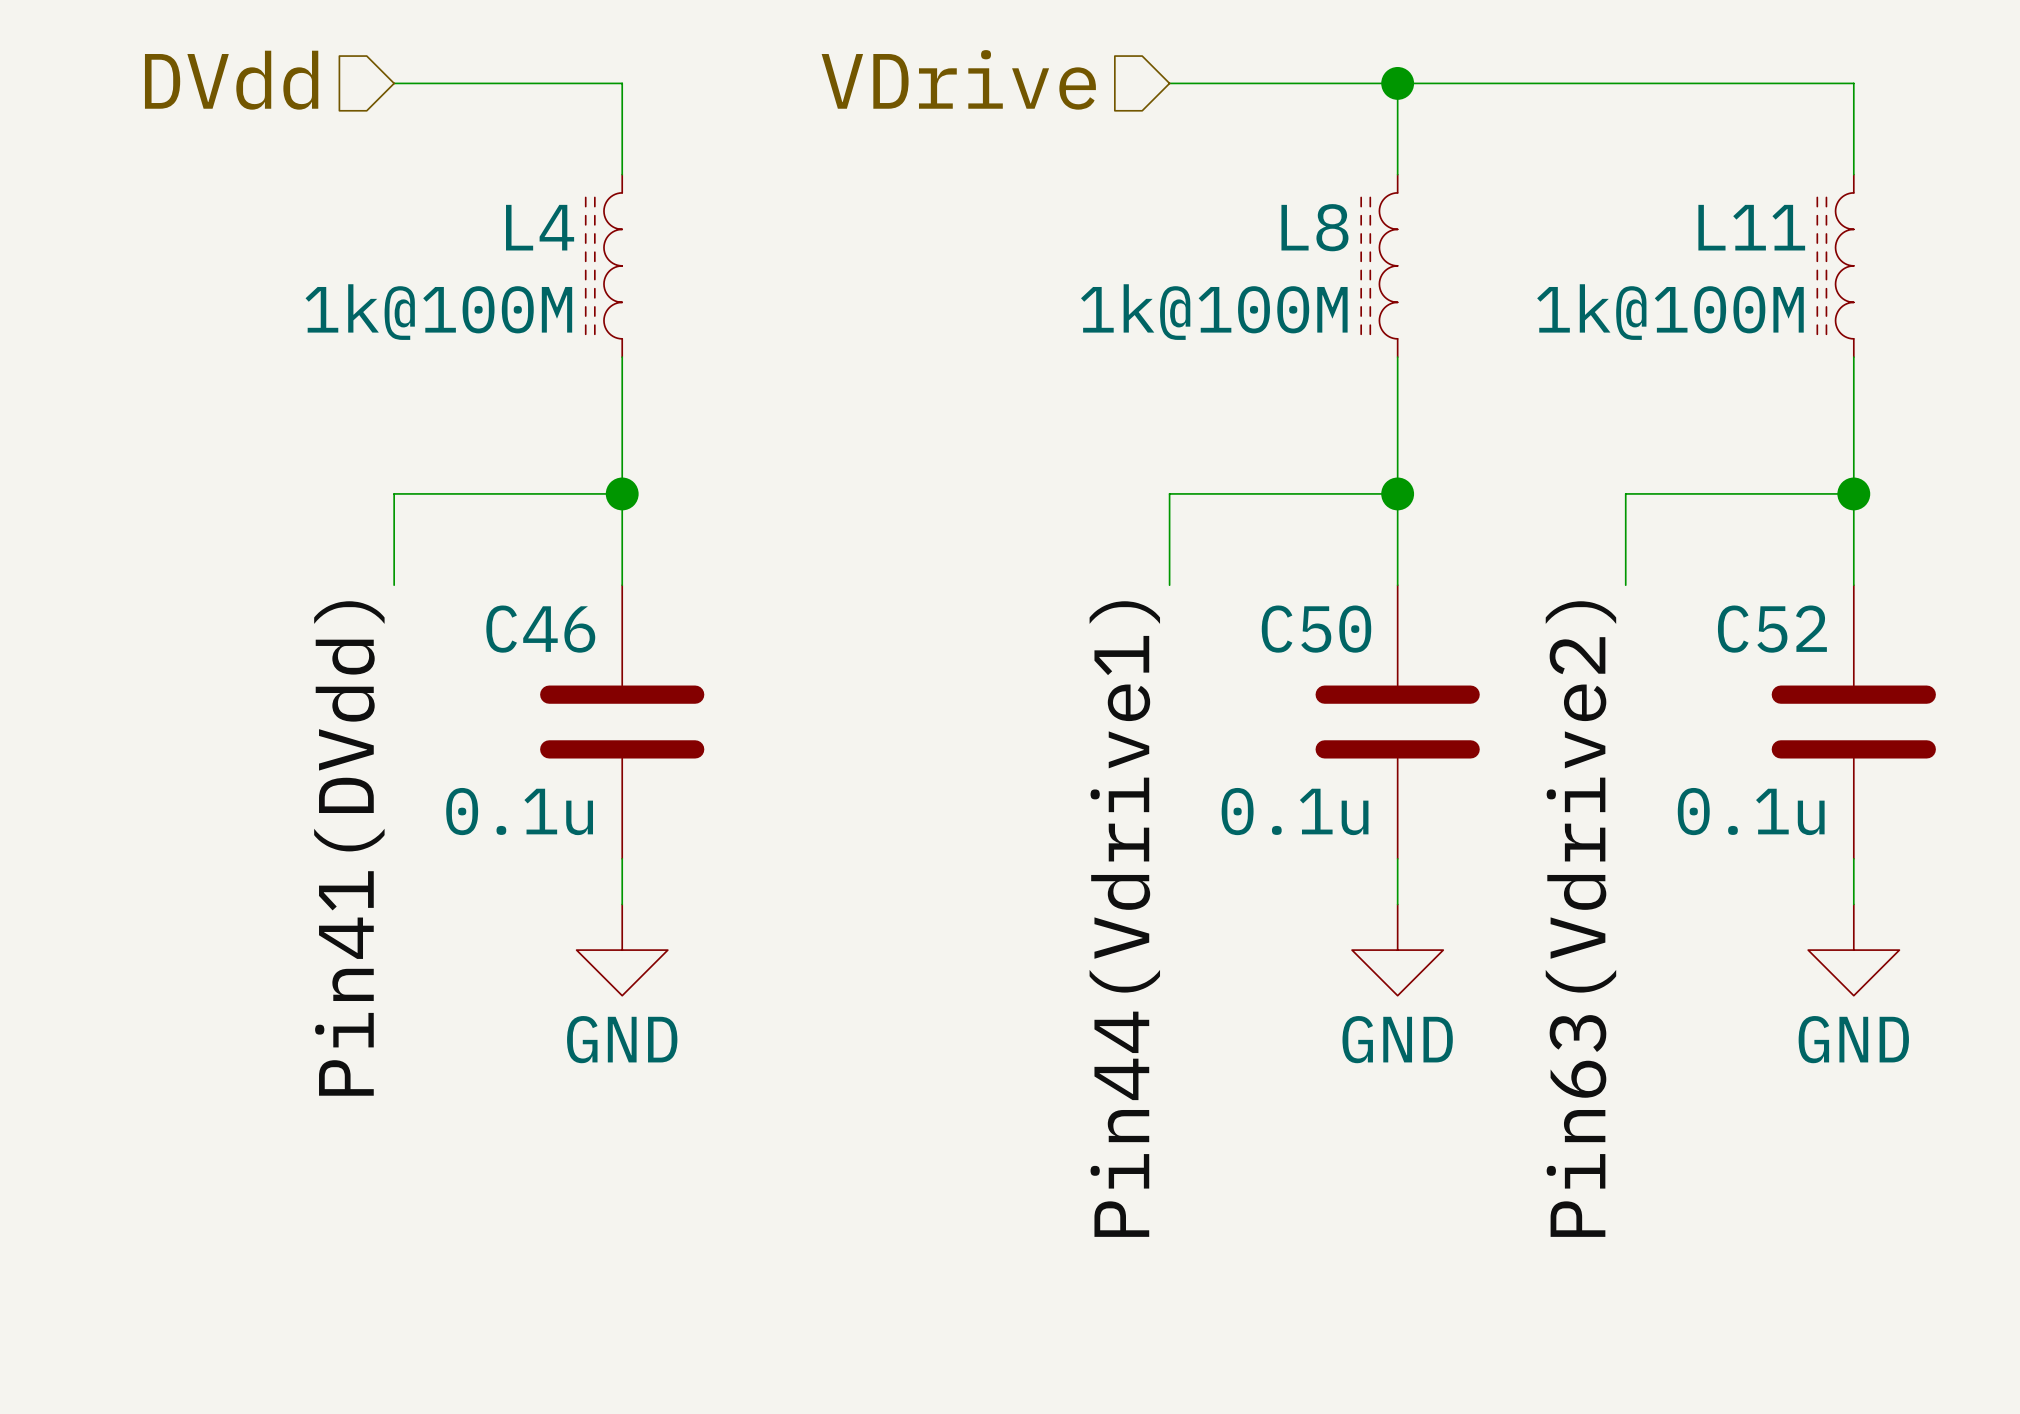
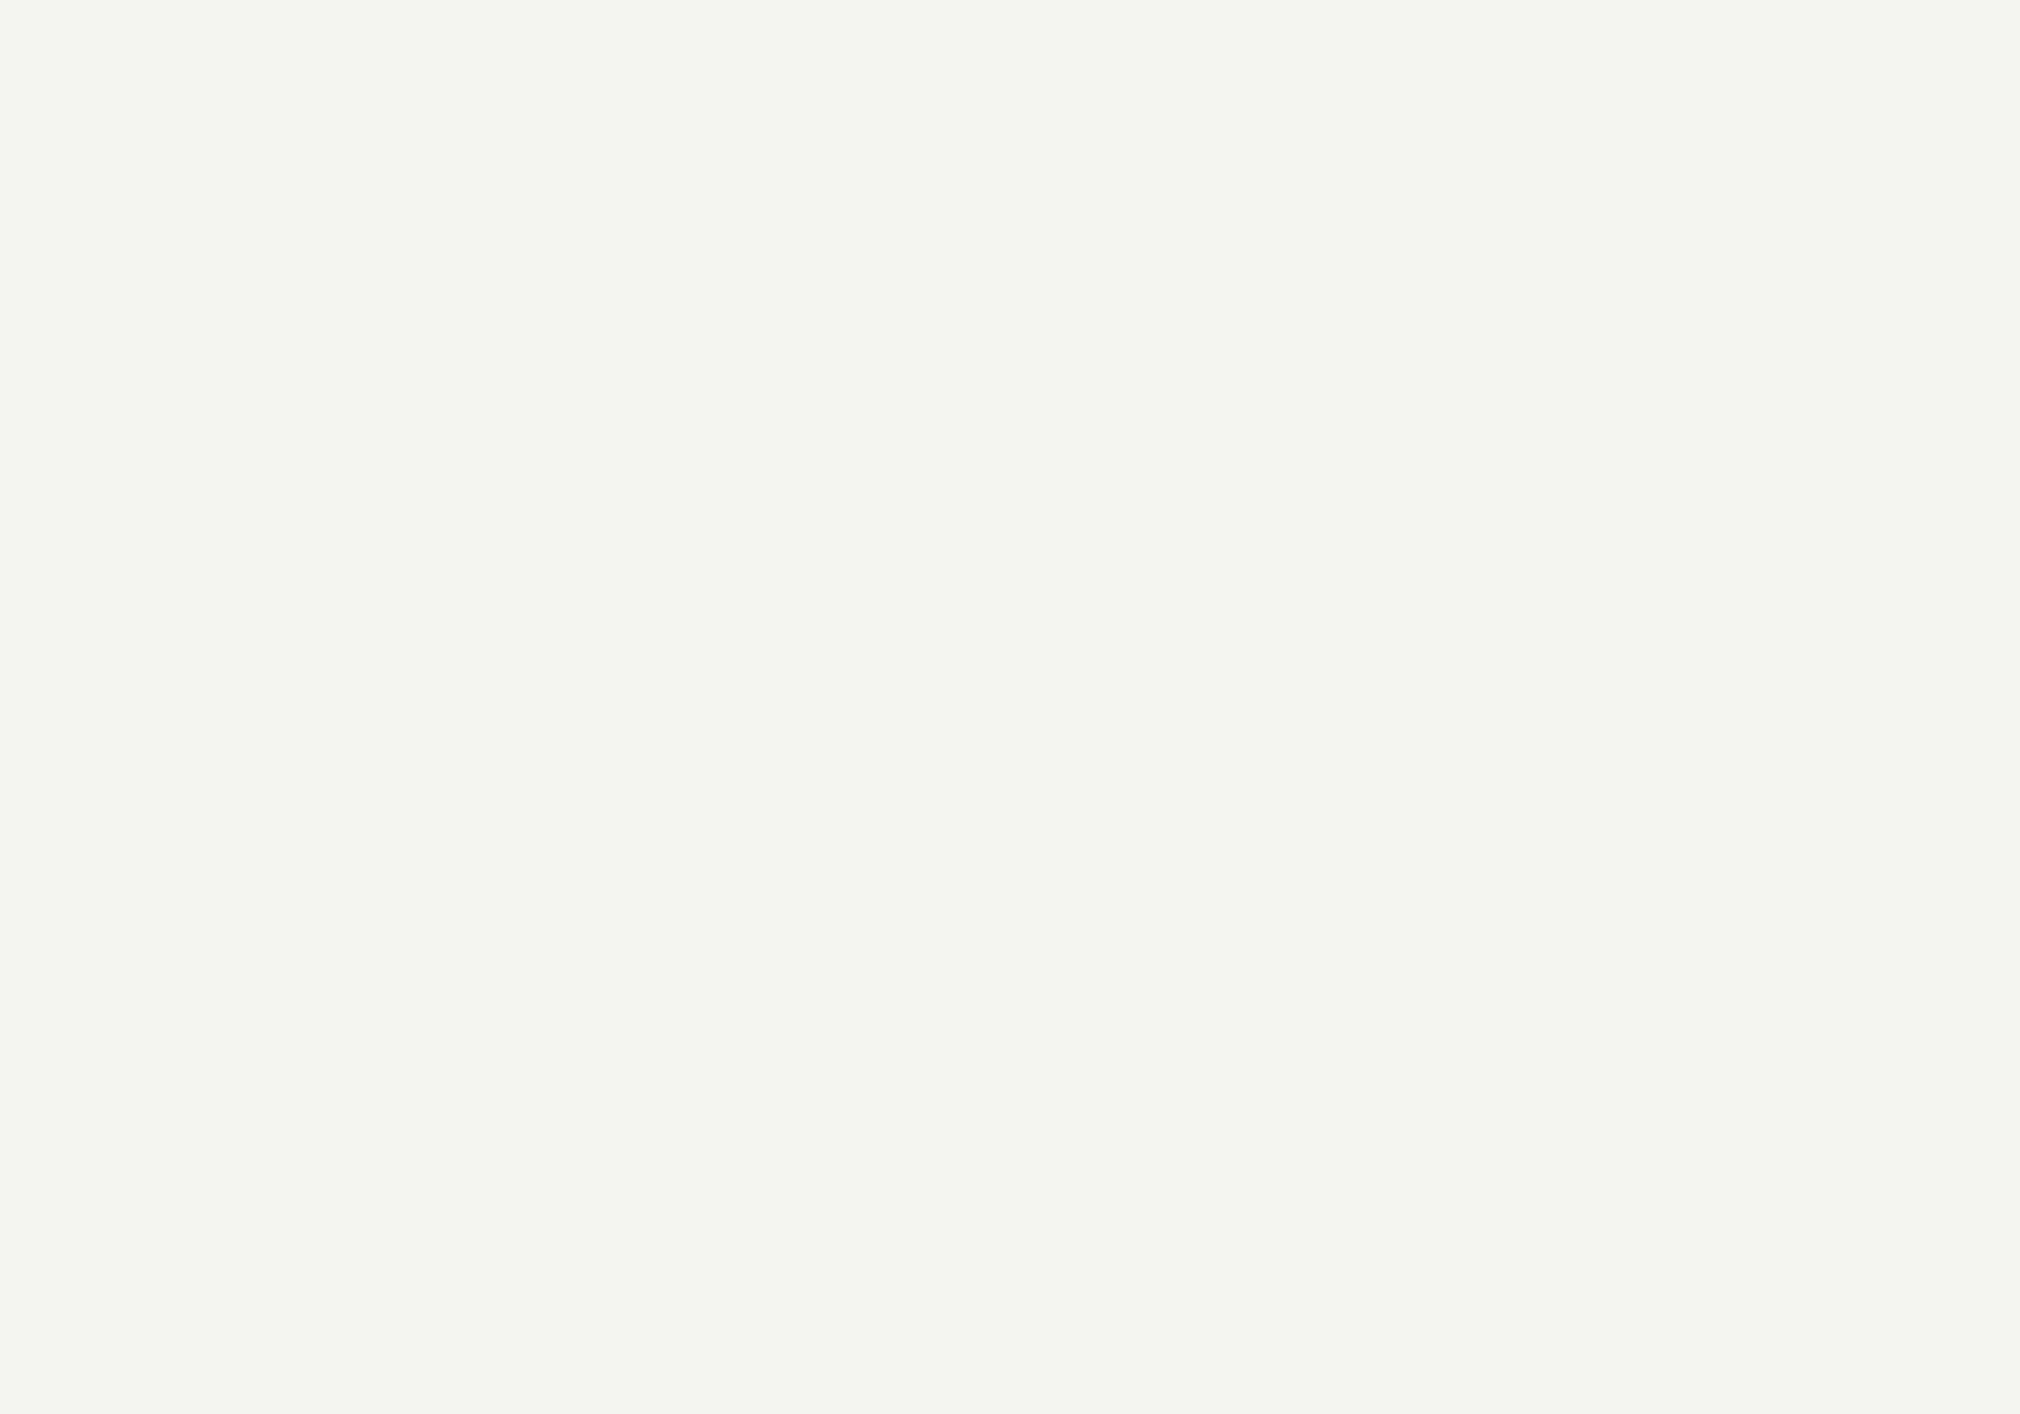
hierarchical label: VDrive (958, 79) -> none
hierarchical label: DVdd (231, 80) -> none
wire: (394, 83) (622, 83) (622, 174) -> none
wire: (1169, 83) (1853, 83) (1853, 174) -> none
wire: (1397, 83) (1397, 174) -> none
junction: (1397, 83) -> none
L4: 1k@100M (603, 265) -> none
L8: 1k@100M (1379, 265) -> none
L11: 1k@100M (1835, 265) -> none
wire: (622, 357) (622, 585) -> none
wire: (1397, 357) (1397, 585) -> none
wire: (1853, 357) (1853, 585) -> none
wire: (622, 493) (394, 493) (394, 585) -> none
junction: (622, 493) -> none
wire: (1397, 493) (1169, 493) (1169, 585) -> none
junction: (1397, 493) -> none
wire: (1853, 493) (1625, 493) (1625, 585) -> none
junction: (1853, 493) -> none
C46: 0.1u (622, 722) -> none
C50: 0.1u (1397, 722) -> none
C52: 0.1u (1853, 722) -> none
label: Pin41(DVdd) (349, 848) -> none
wire: (622, 858) (622, 904) -> none
wire: (1397, 858) (1397, 904) -> none
wire: (1853, 858) (1853, 904) -> none
label: Pin44(Vdrive1) (1124, 919) -> none
label: Pin63(Vdrive2) (1580, 919) -> none
power symbol: GND (622, 950) -> none
power symbol: GND (1397, 950) -> none
power symbol: GND (1853, 950) -> none

